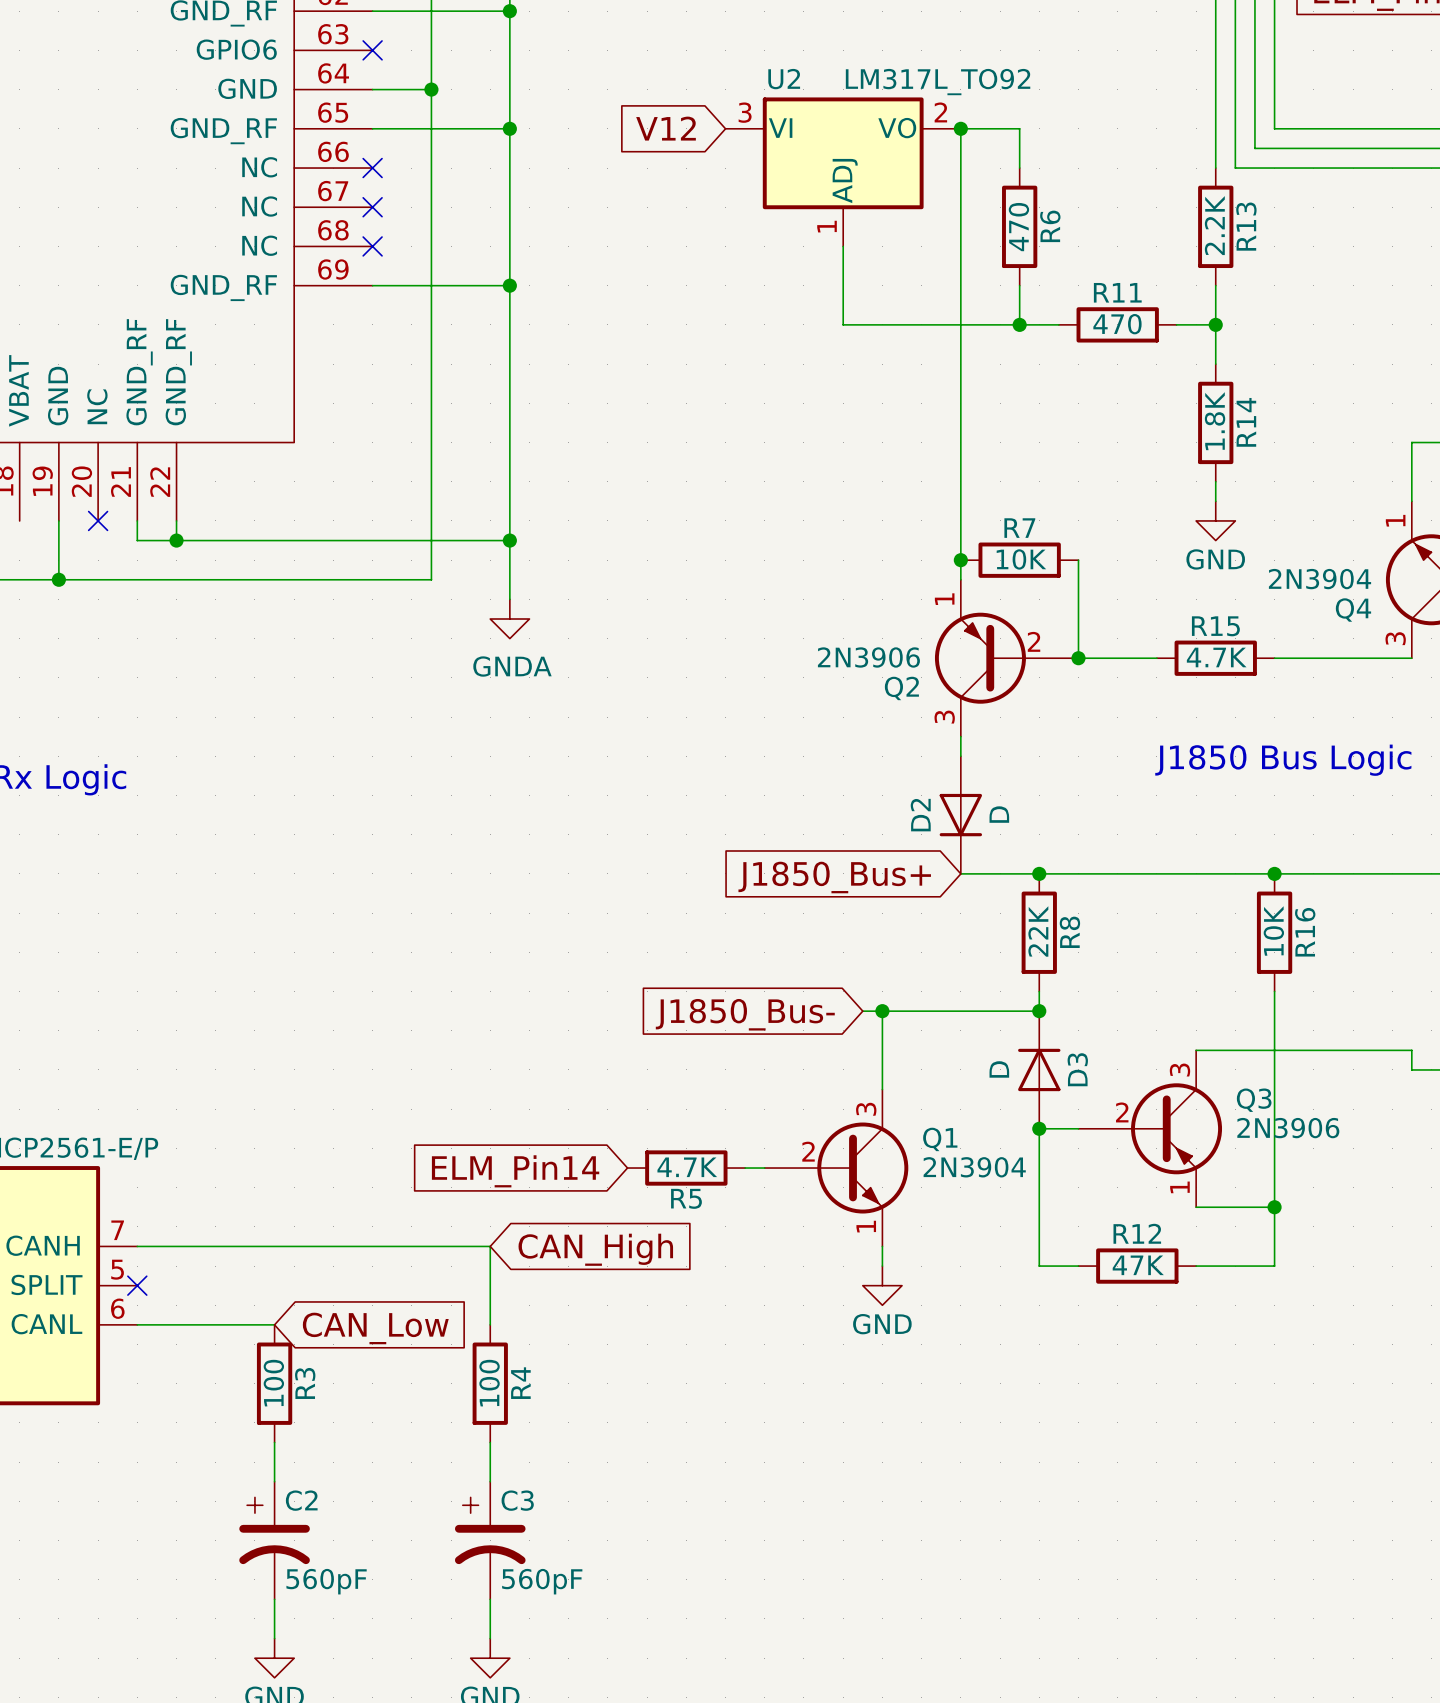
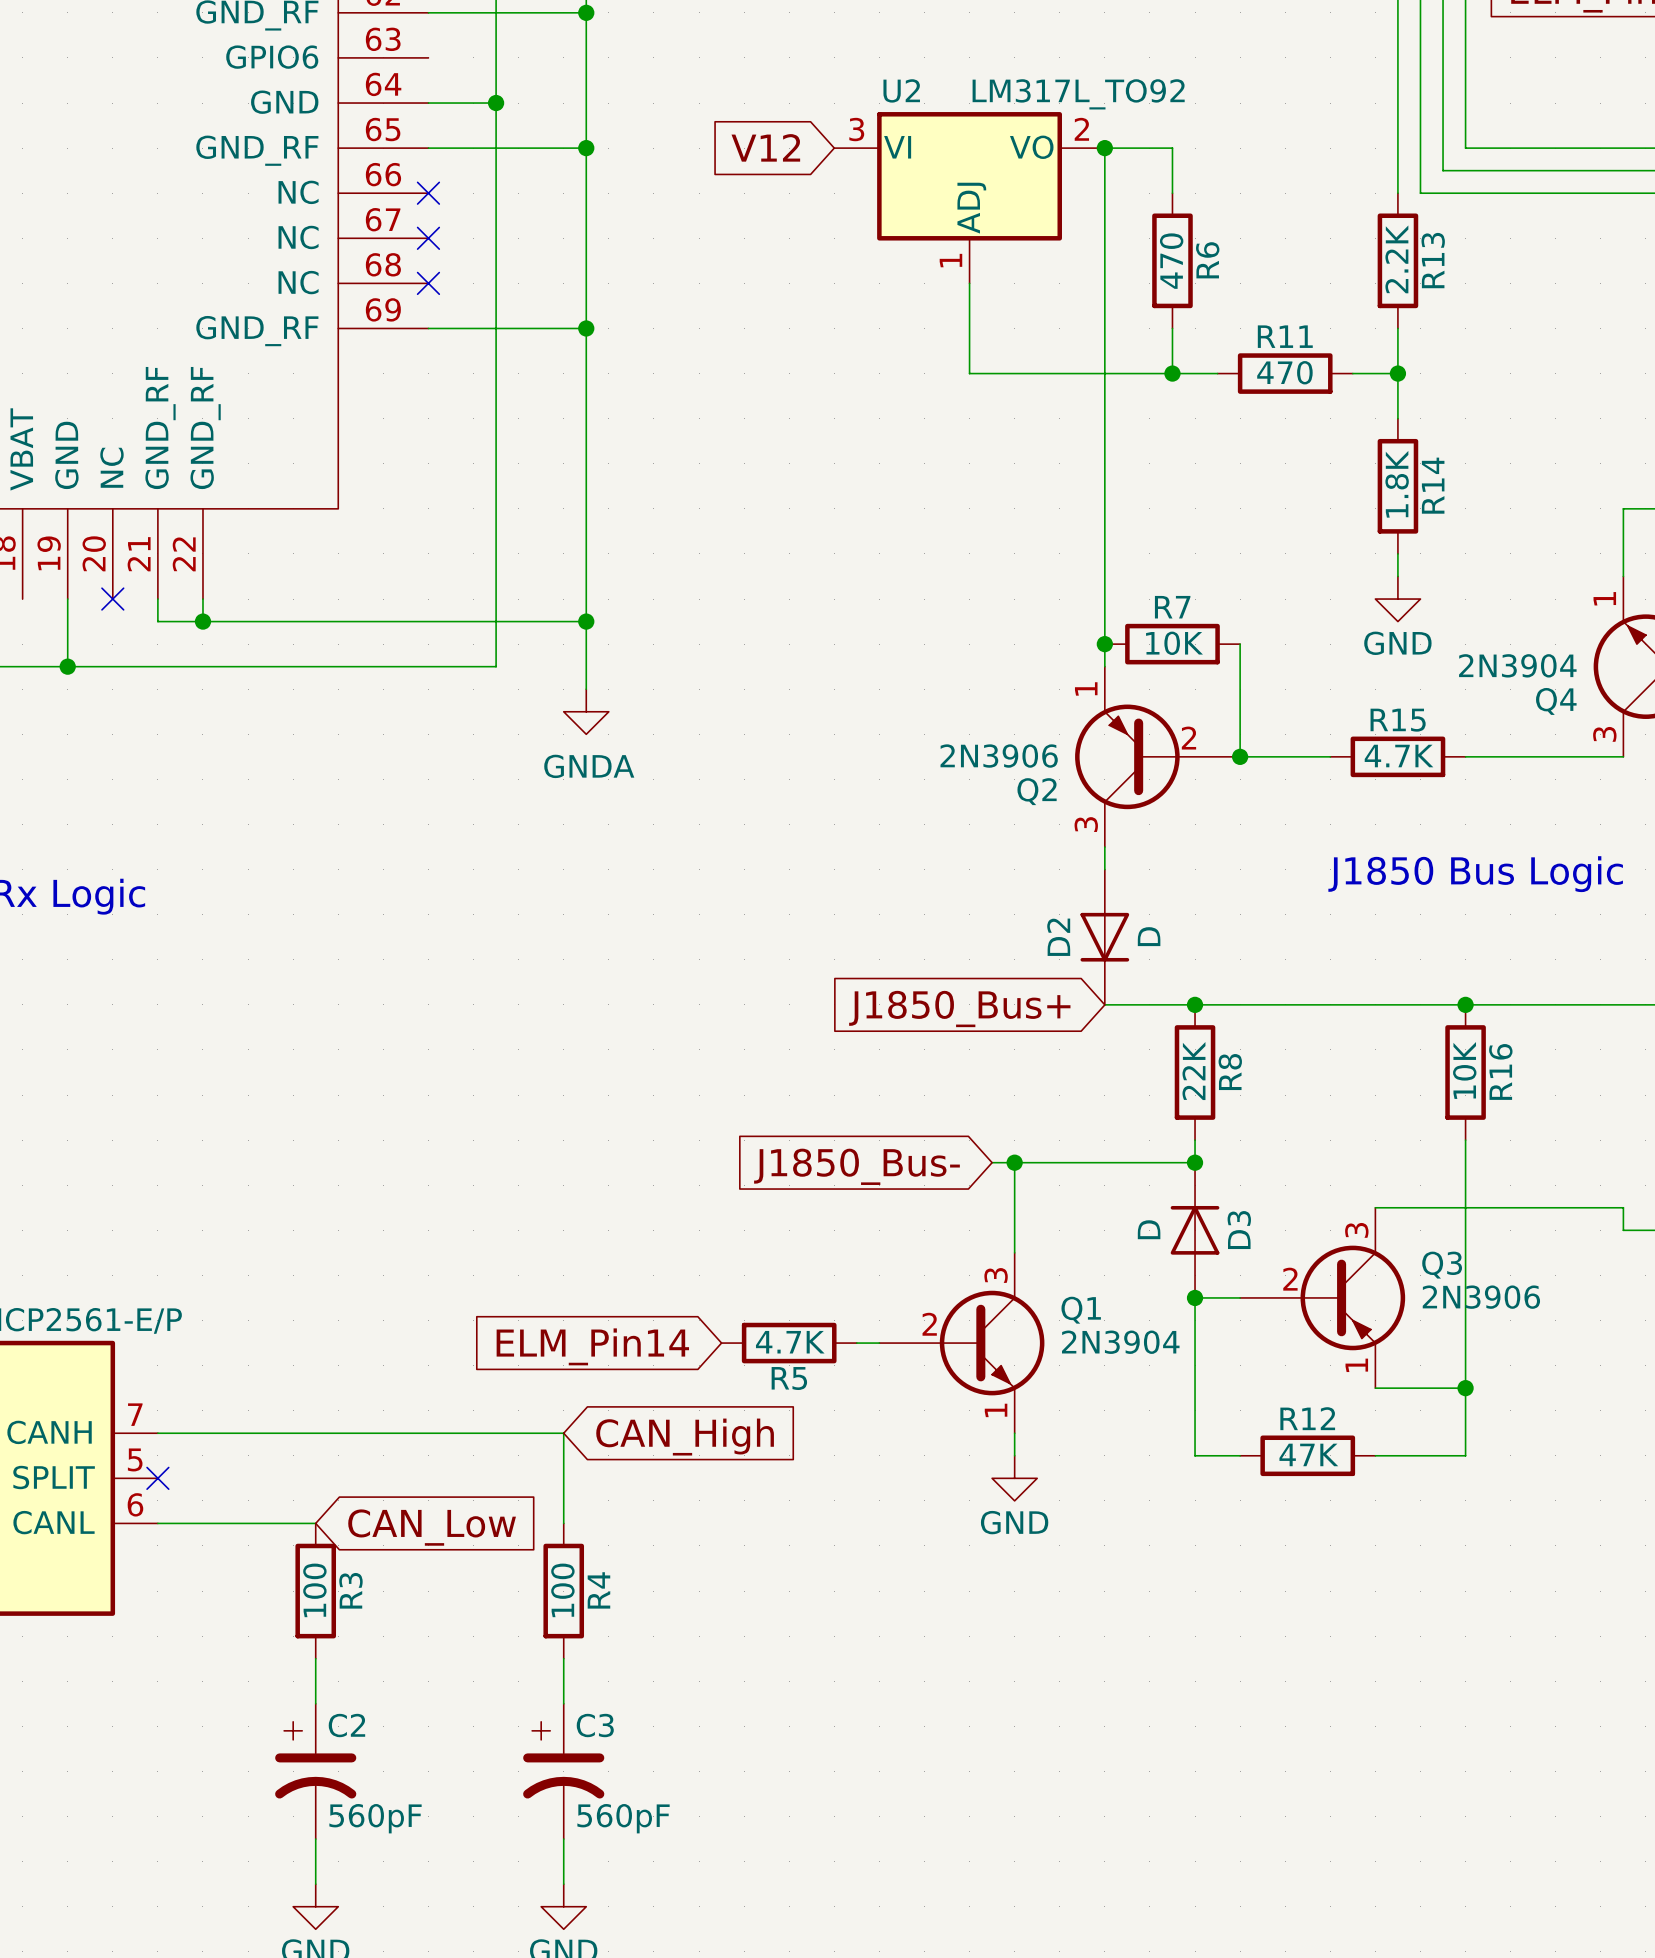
no-connect mark: (372, 50) -> none

